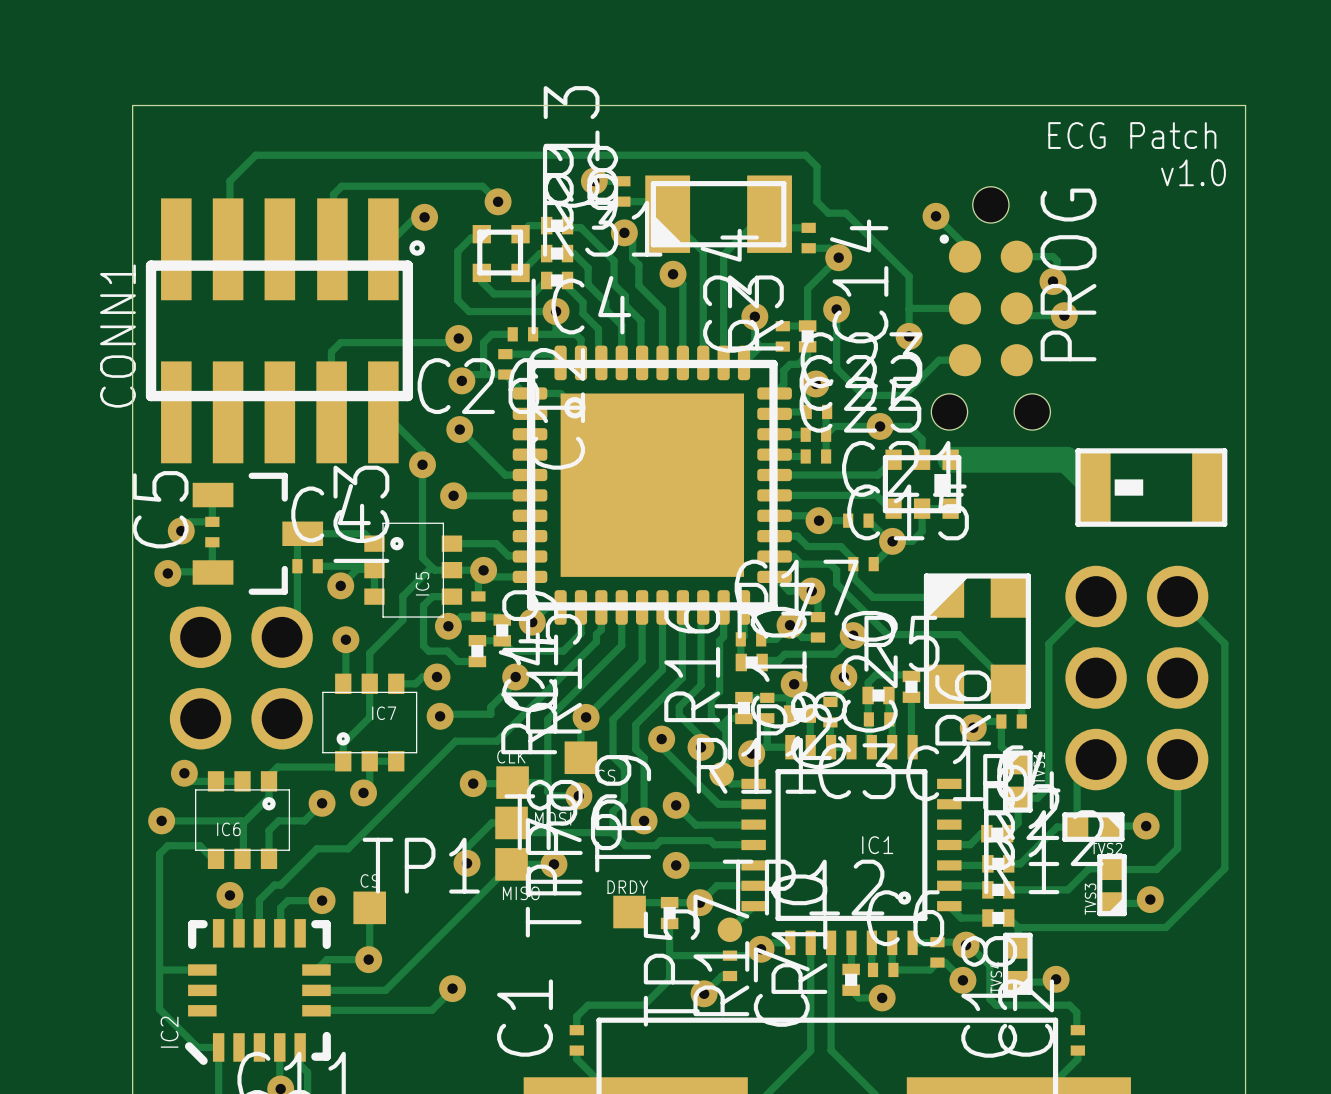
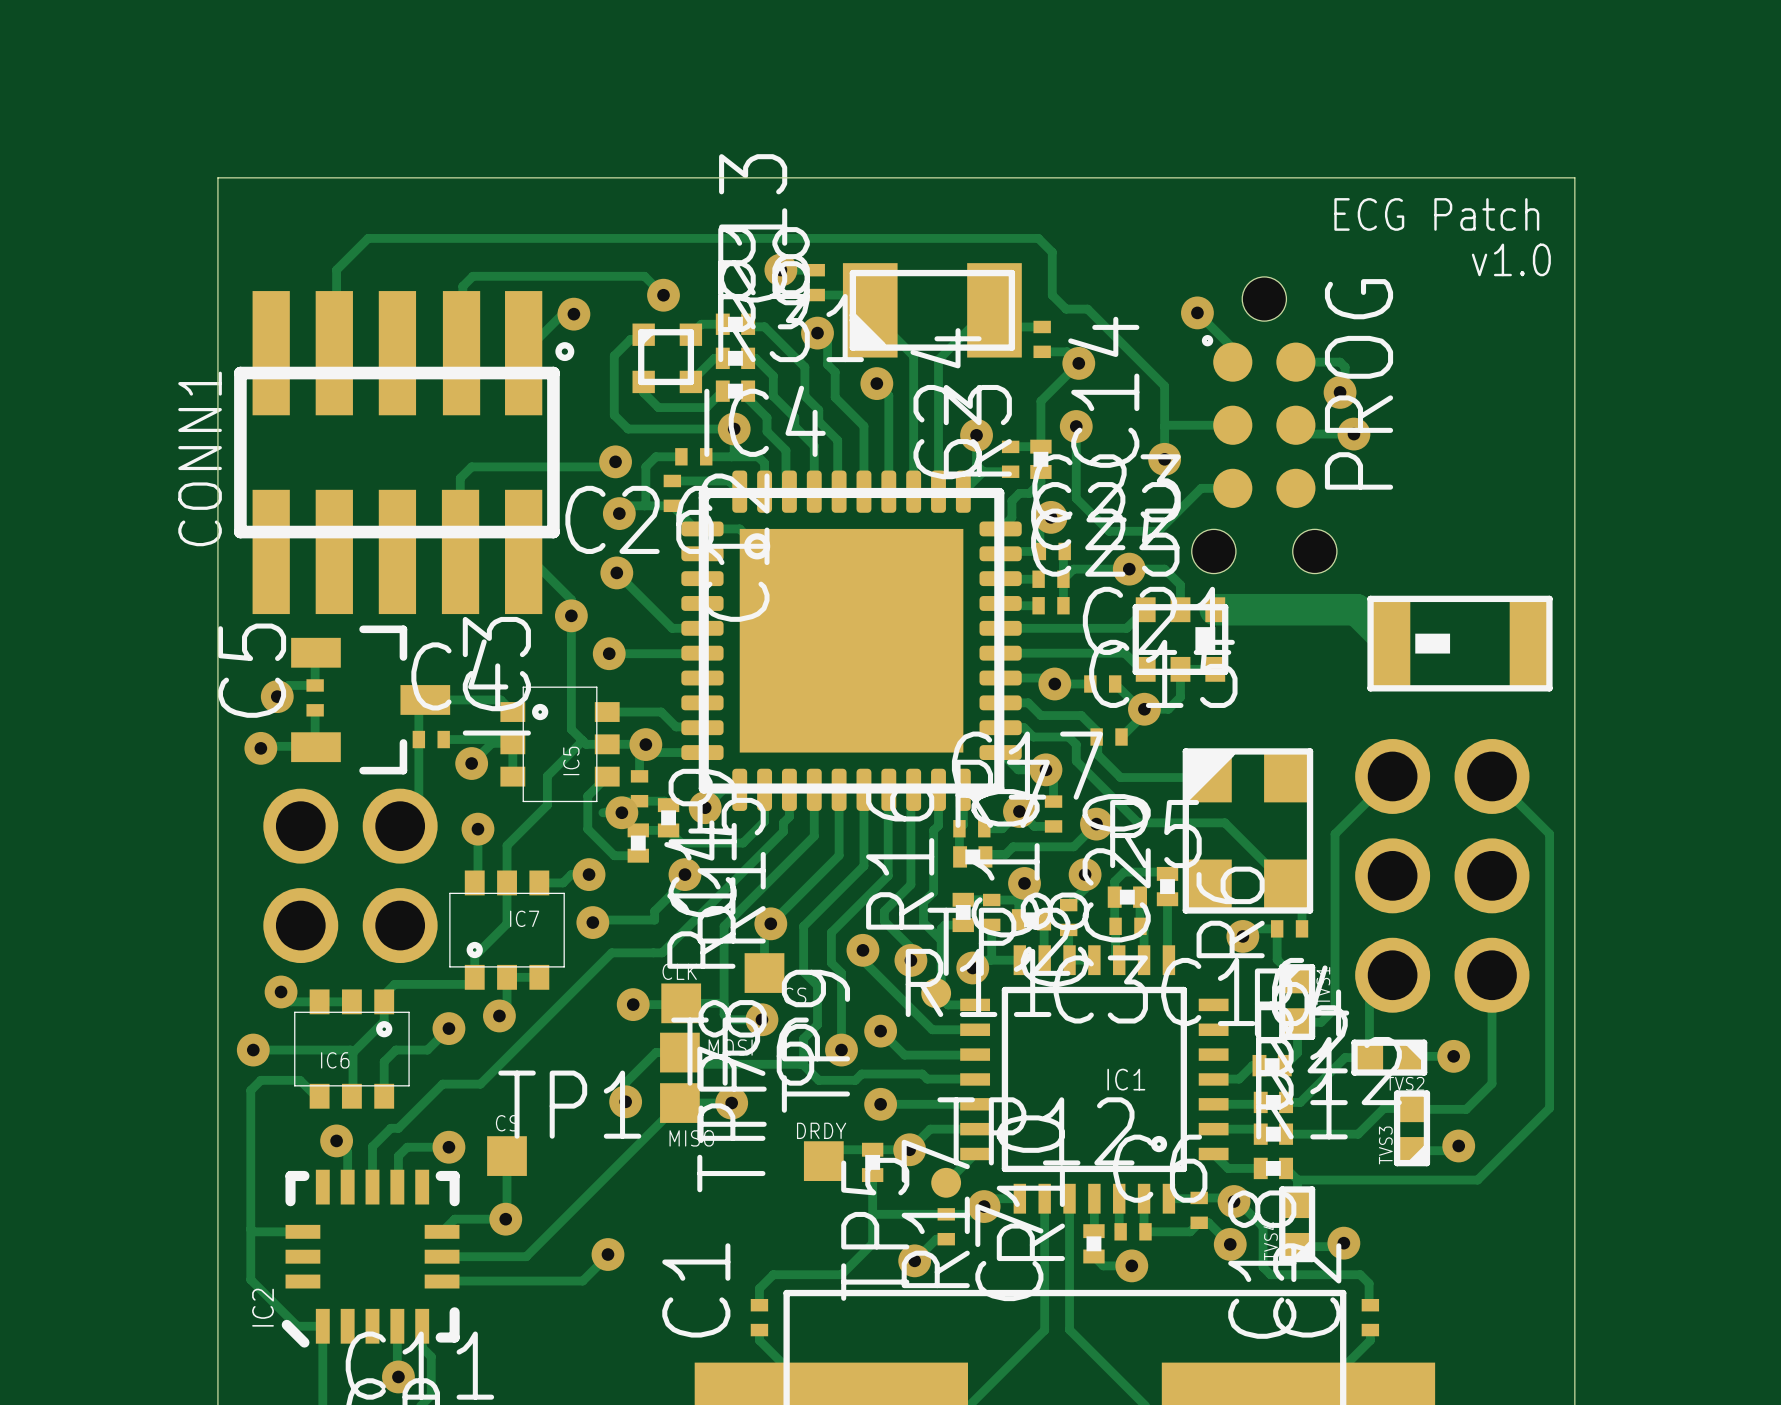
track: (451, 596) (432, 596) (423, 605) (423, 645) (428, 651) (447, 651) -> (607, 776) (587, 796) (587, 829) (601, 843)
via position: (448, 626) -> (621, 812)

